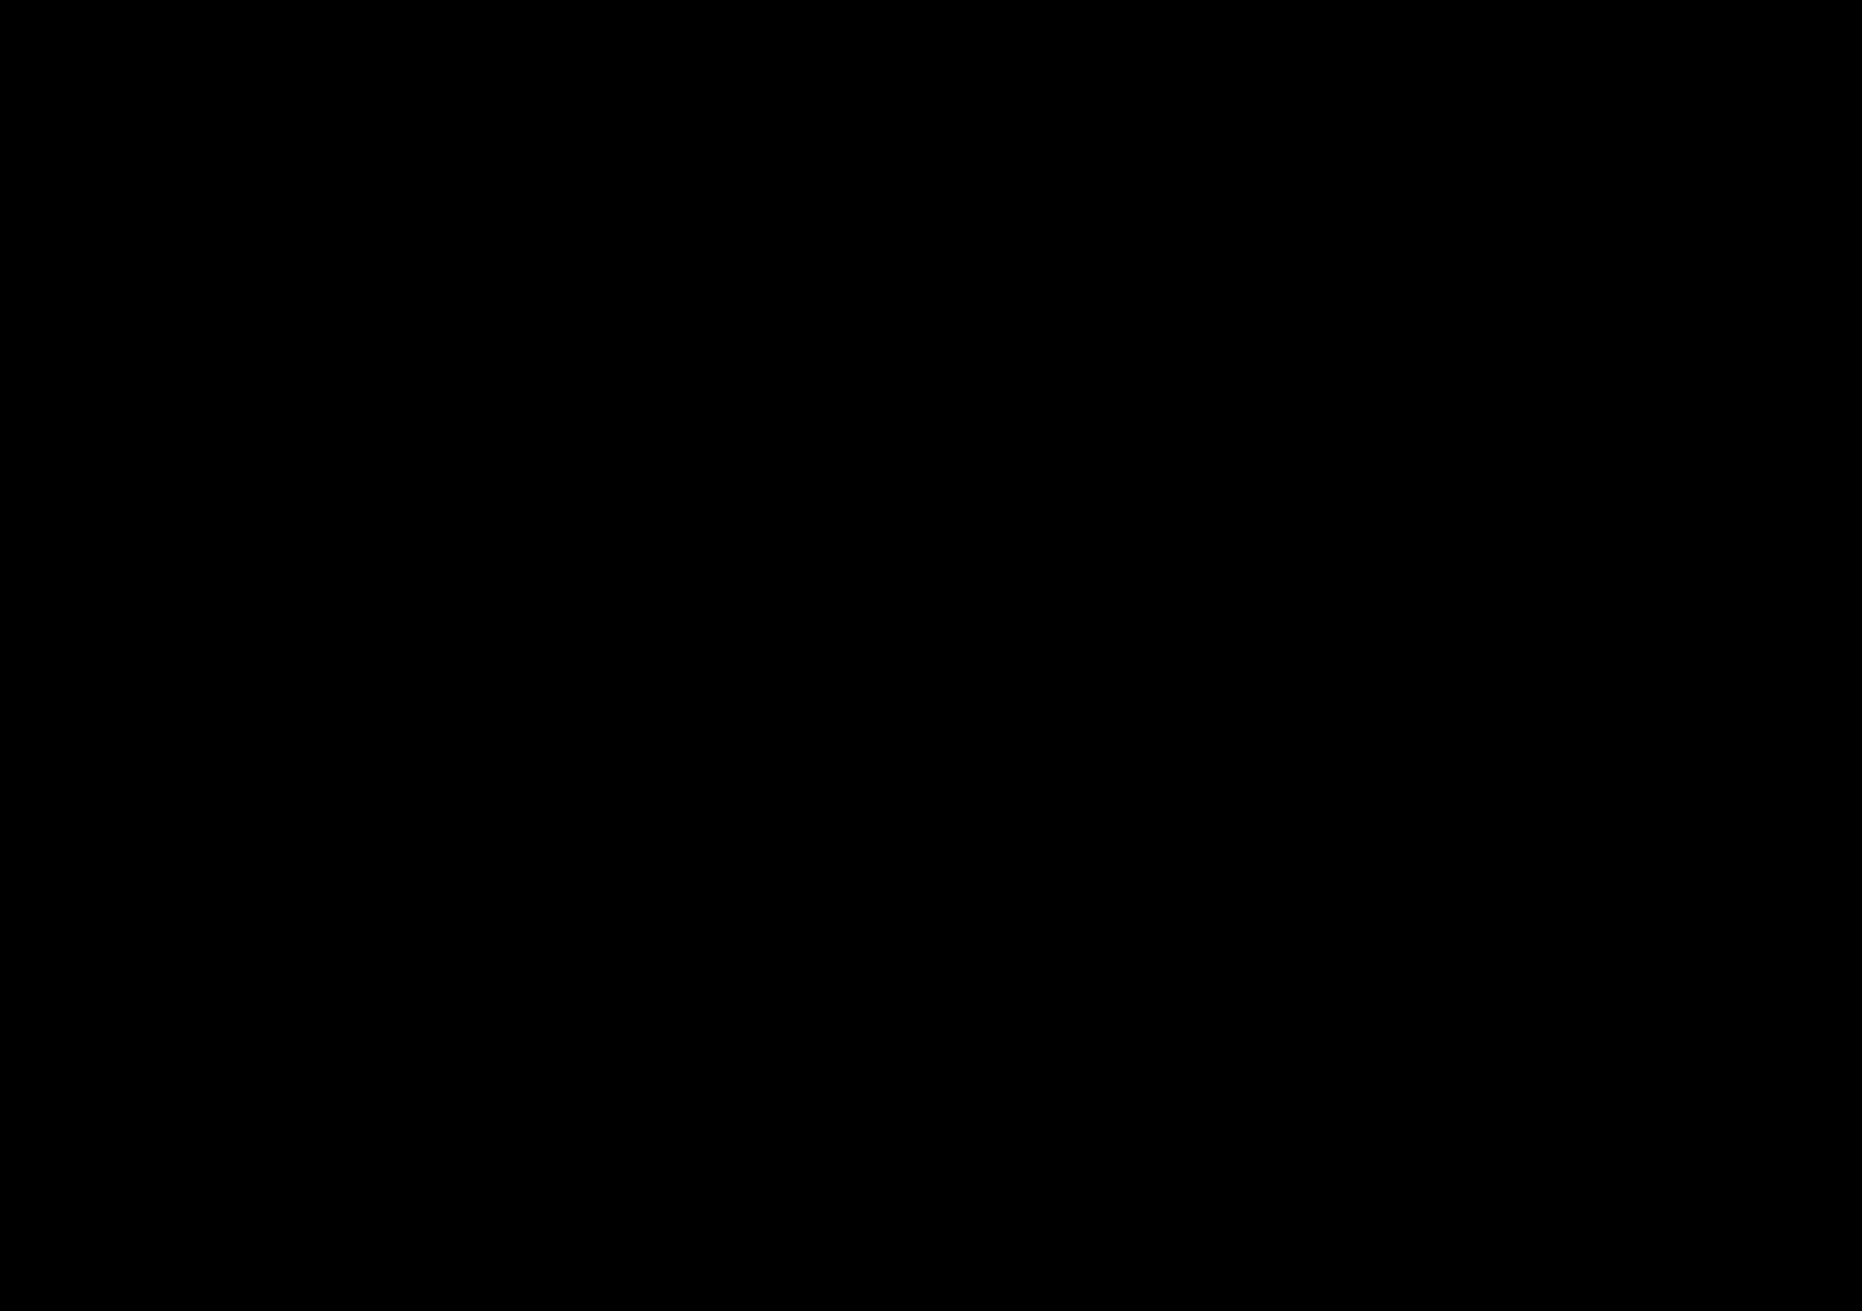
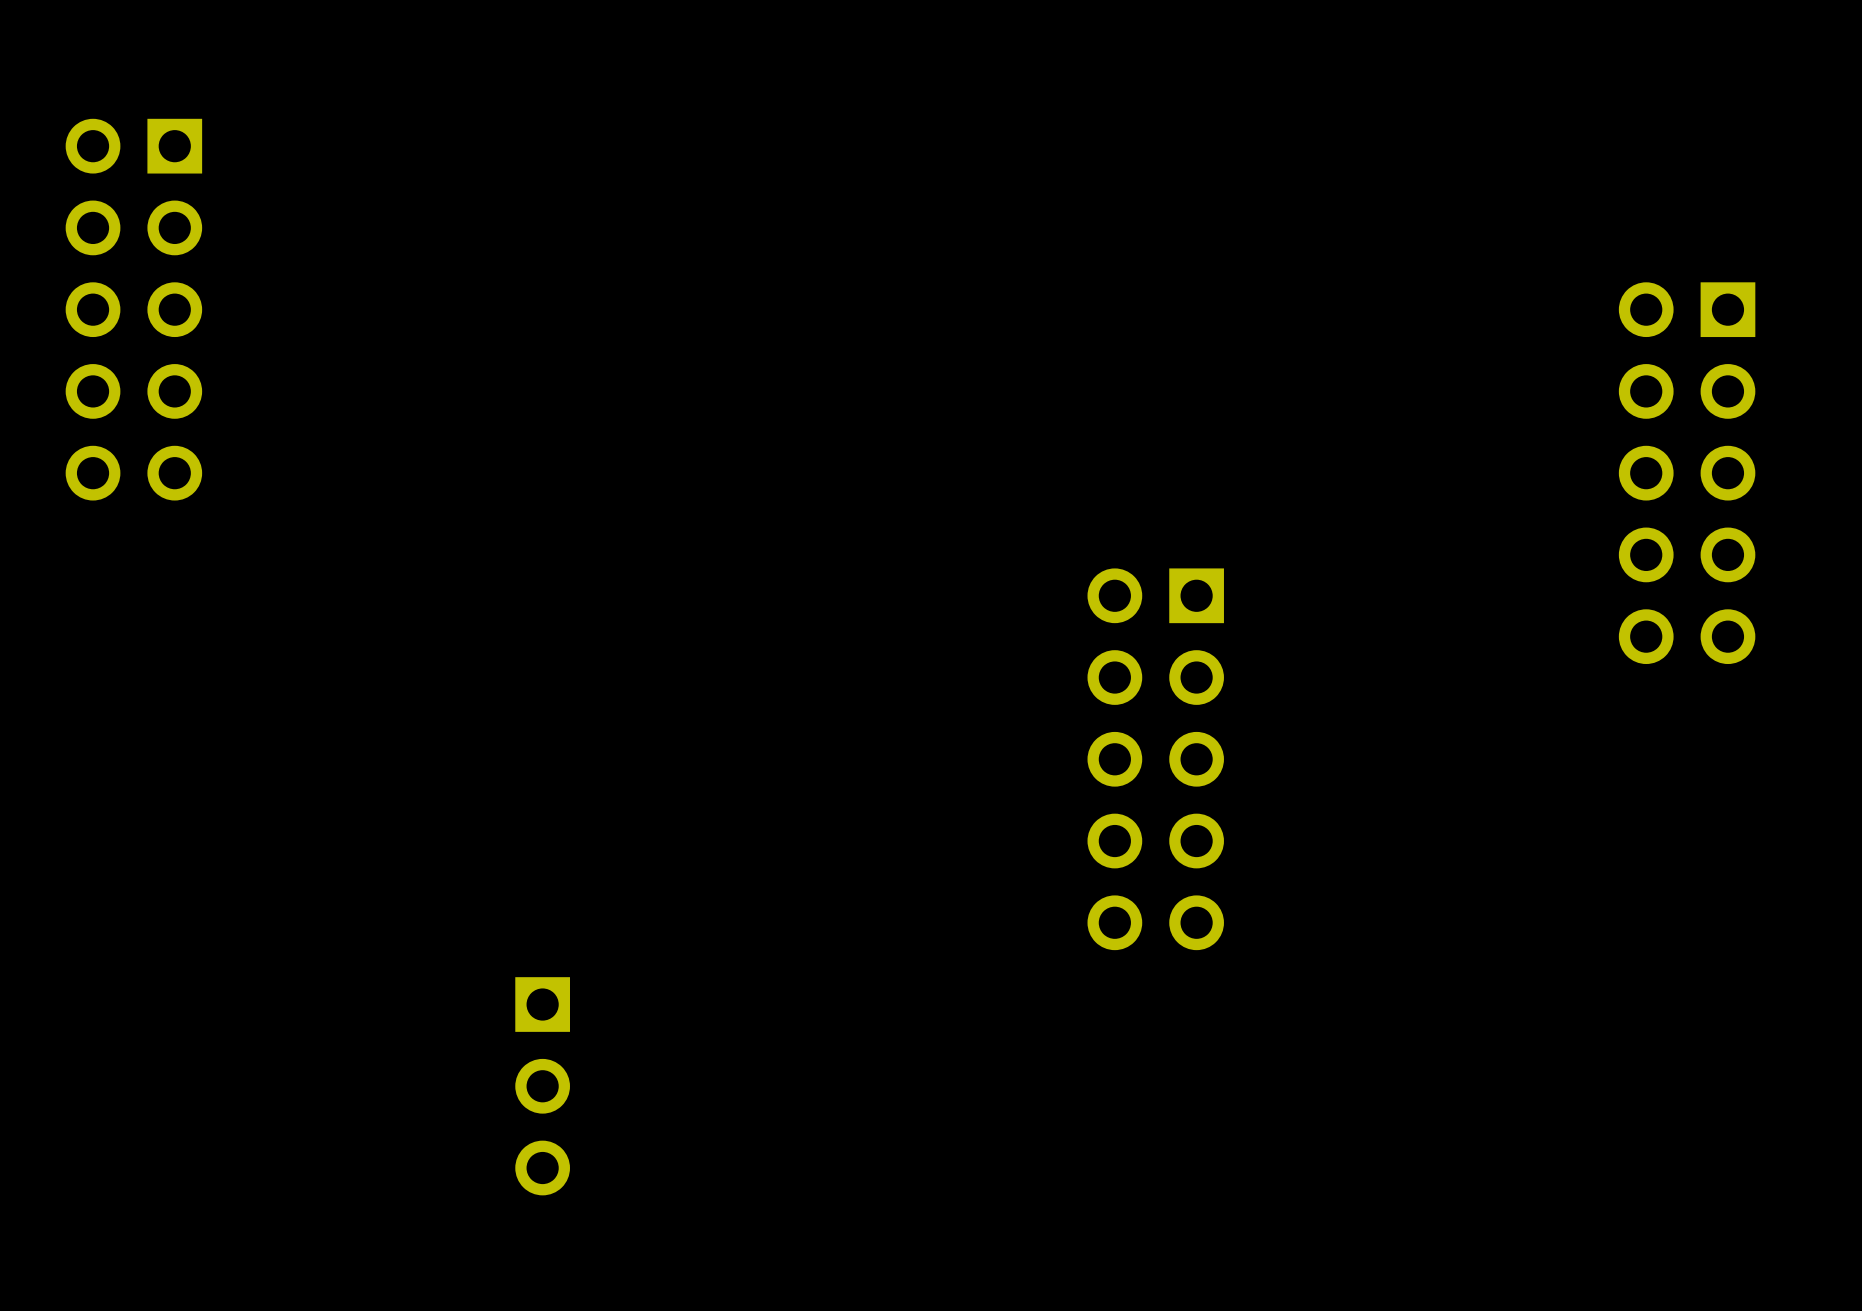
part: none -> (133, 309)
part: none -> (1687, 473)
part: none -> (1155, 759)
part: none -> (542, 1086)

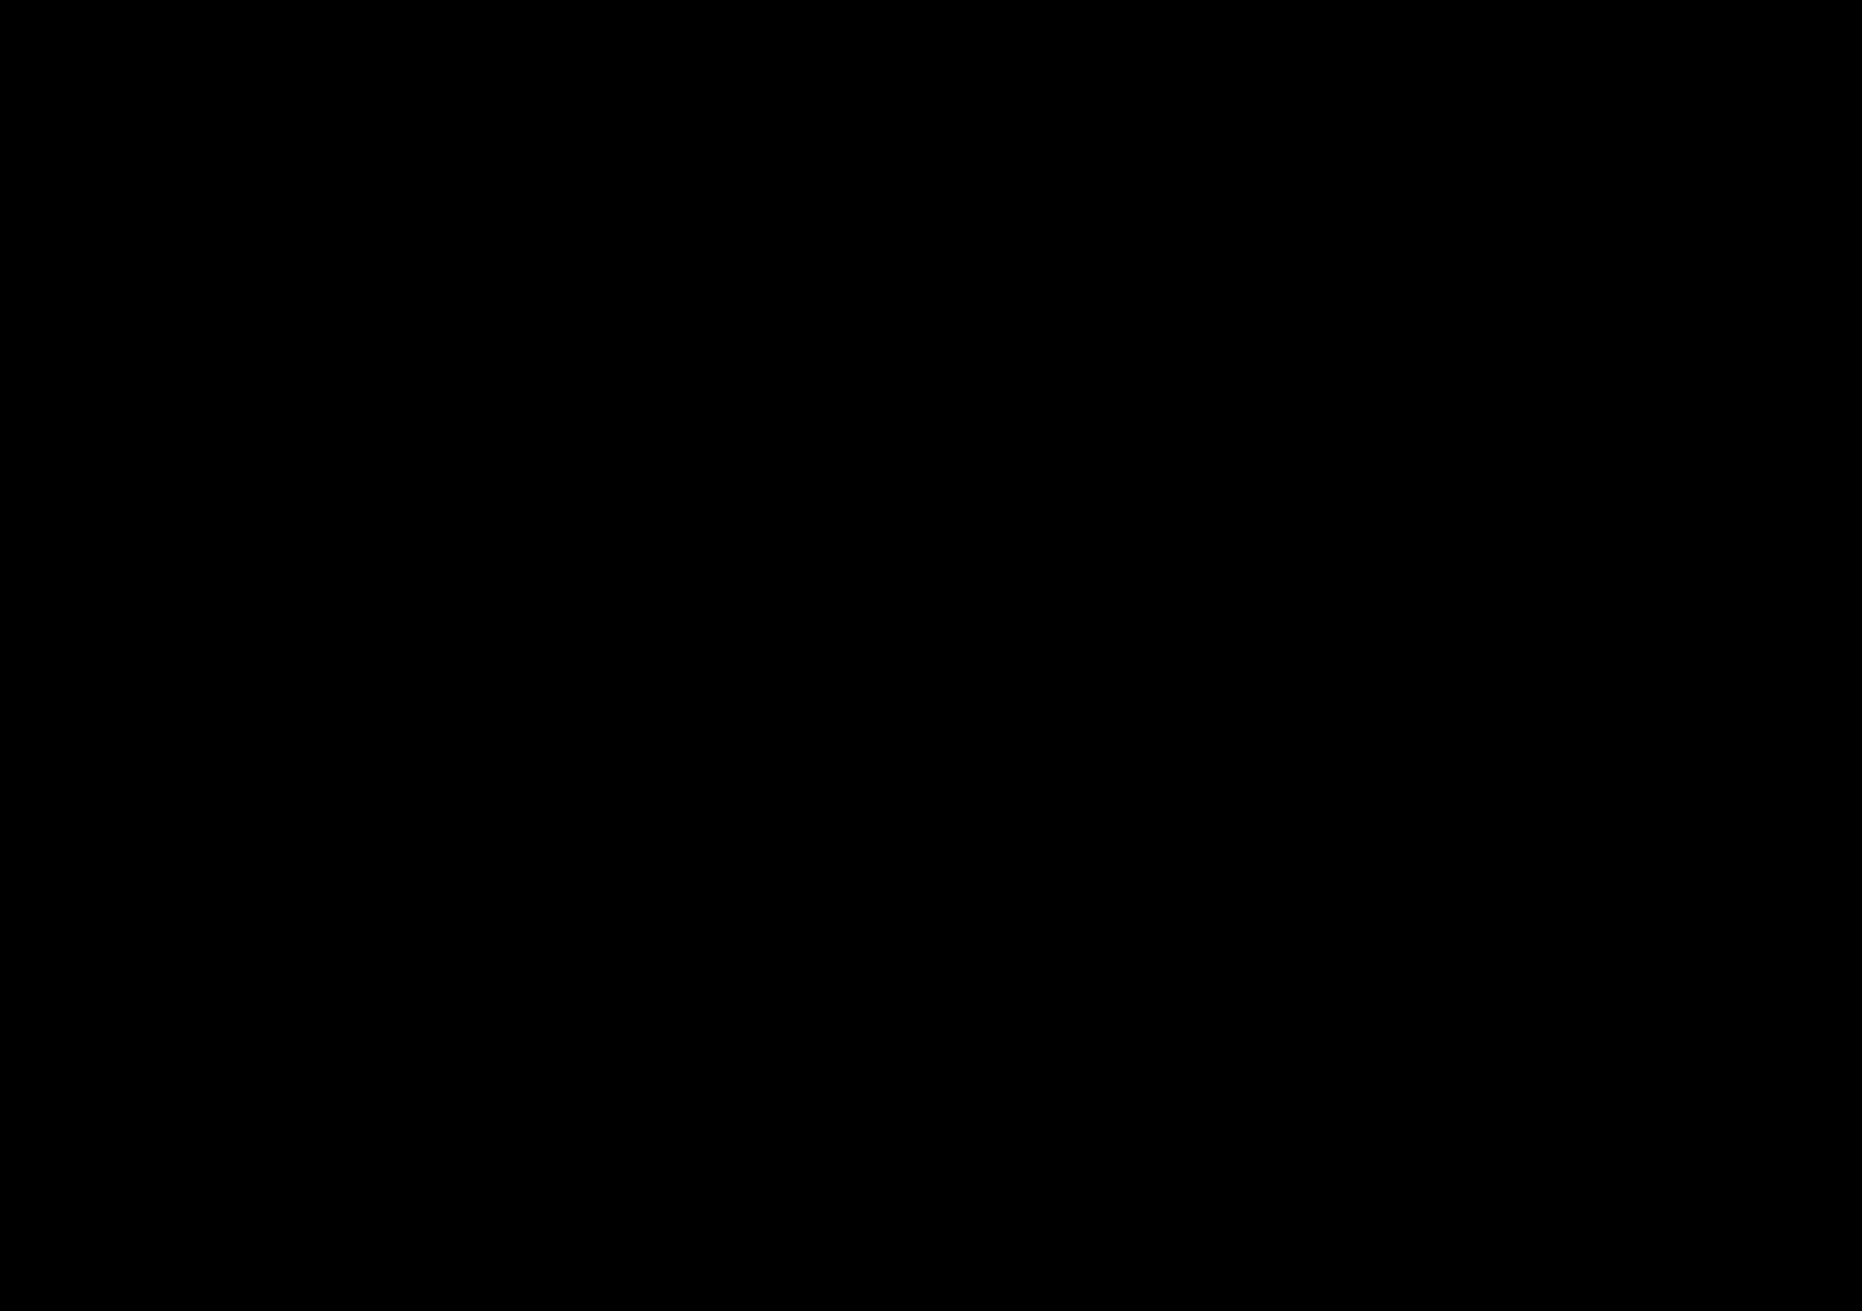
part: (133, 309) -> none
part: (1687, 473) -> none
part: (1155, 759) -> none
part: (542, 1086) -> none

